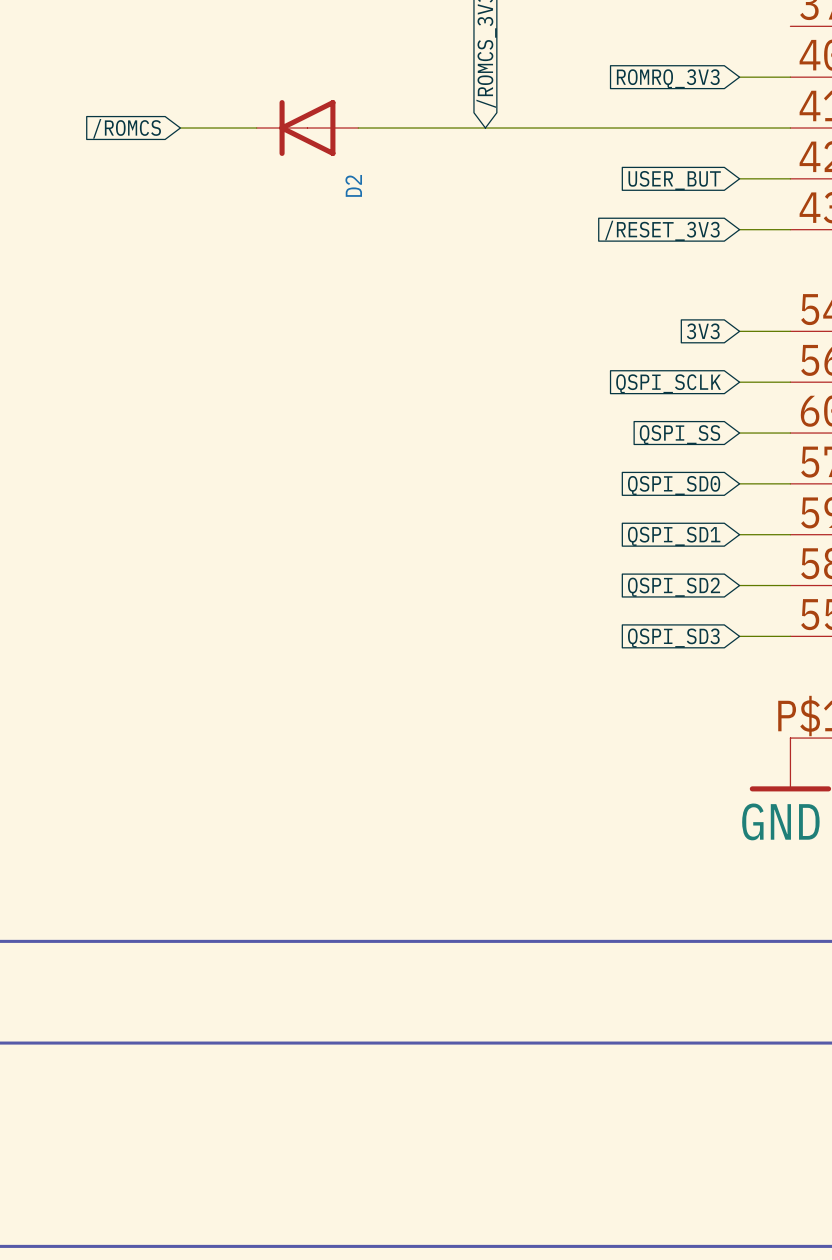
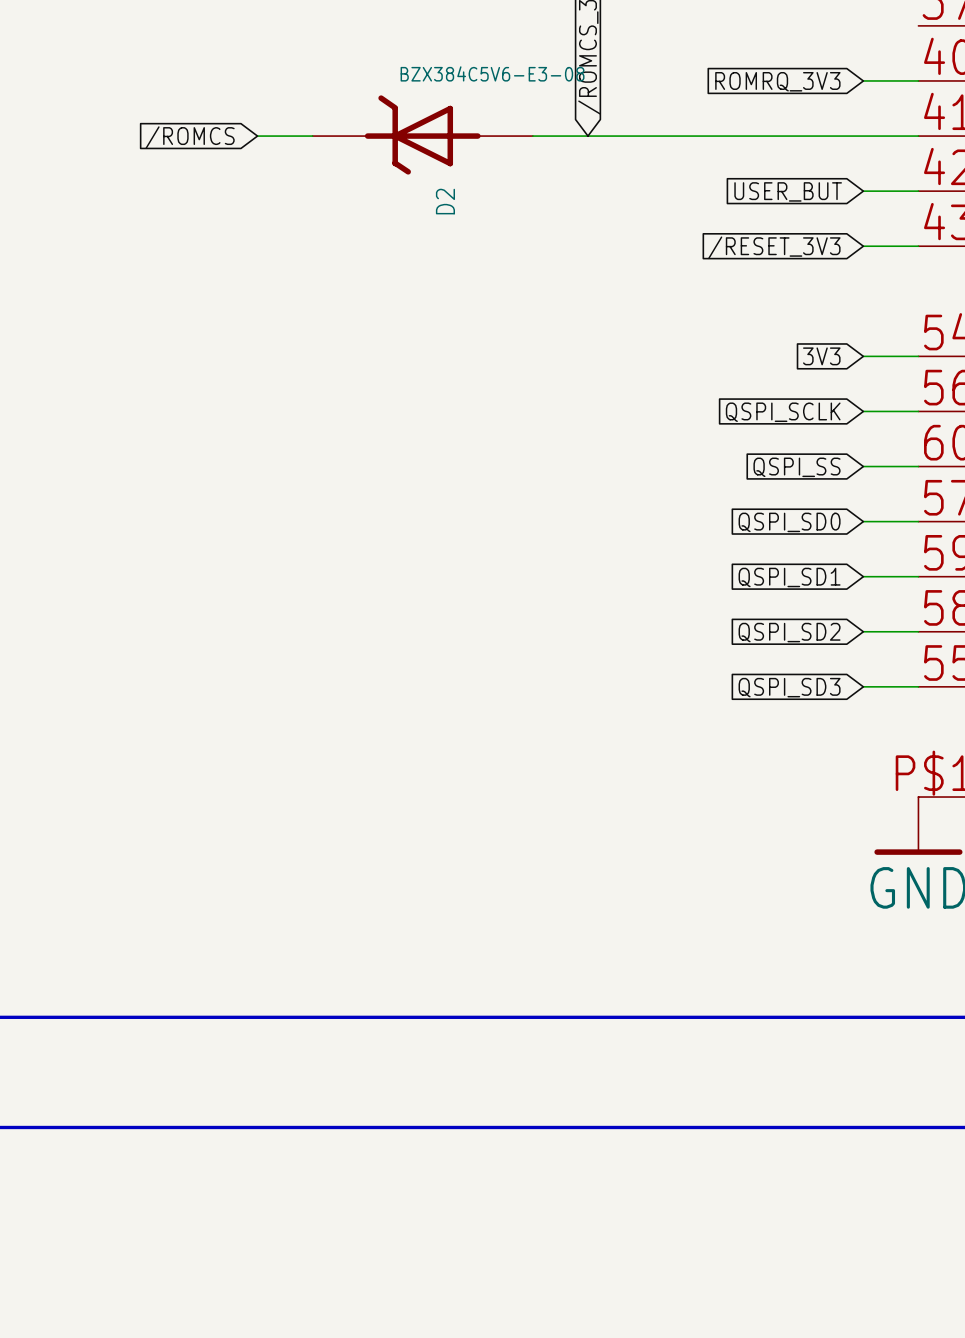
D2 value: none -> BZX384C5V6-E3-08 (492, 73)
D2 symbol: [256, 100, 359, 156] -> [312, 95, 533, 175]

